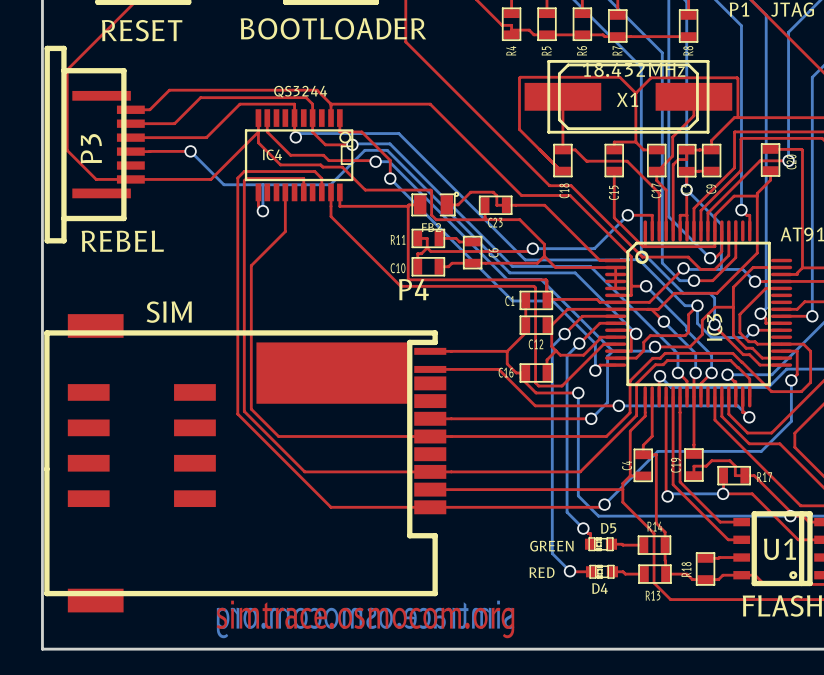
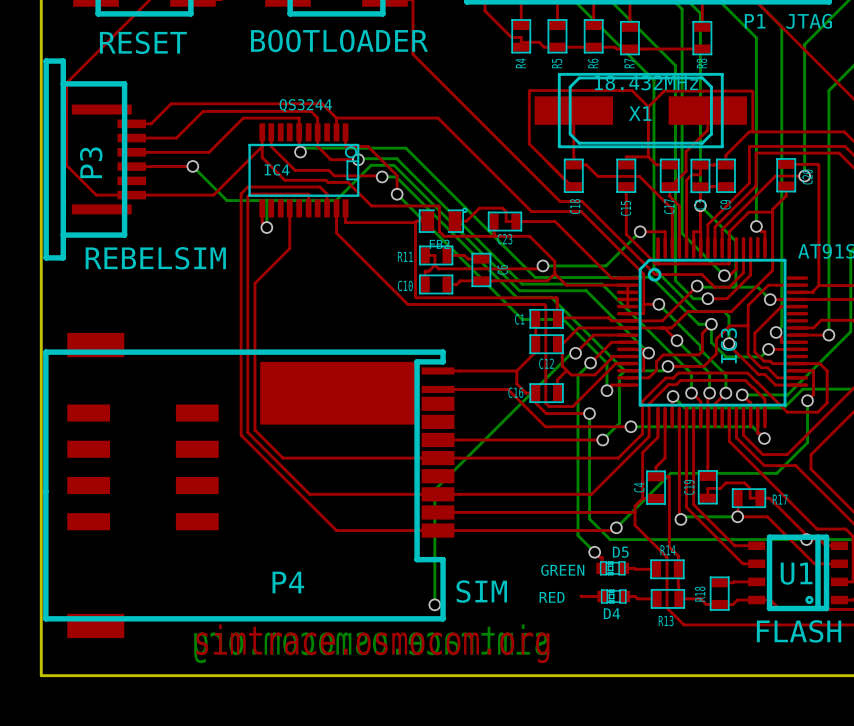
P3 value: REBEL (122, 241) -> REBELSIM (155, 258)
P4 name position: P4 (413, 289) -> P4 (288, 582)
P4 value position: SIM (169, 312) -> SIM (481, 591)
bottom track: none -> (575, 348) (434, 489) (434, 604)
bottom track: (564, 334) (552, 346) (552, 553) (570, 571) -> none
via: (570, 571) -> none
via: none -> (434, 604)

